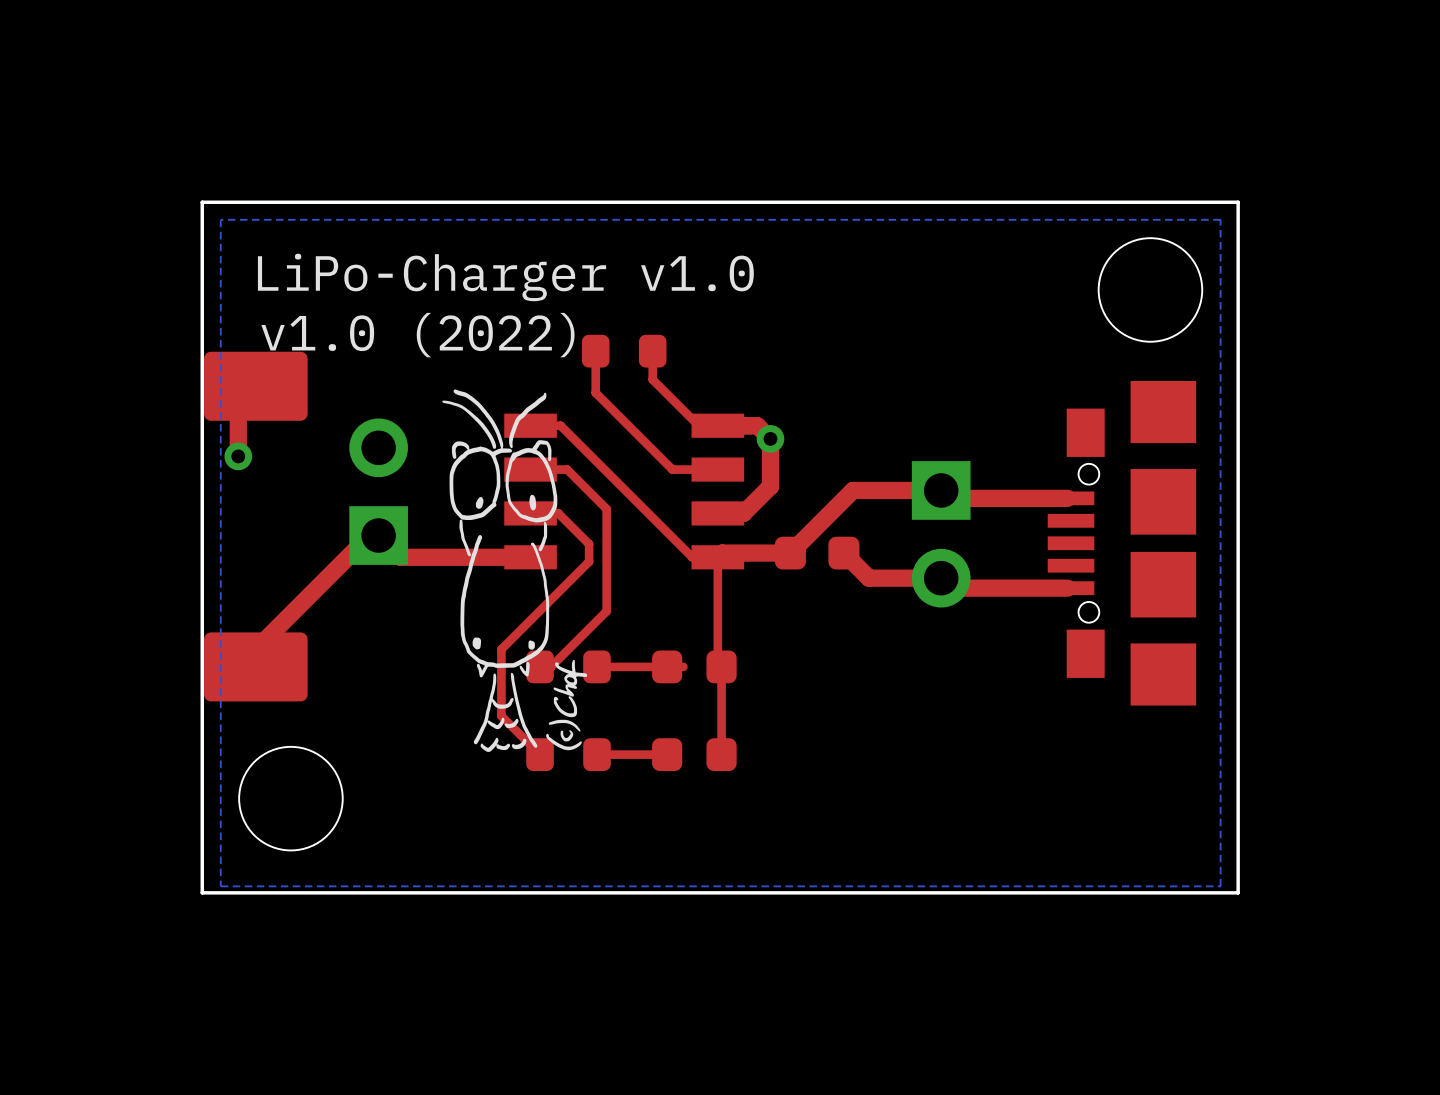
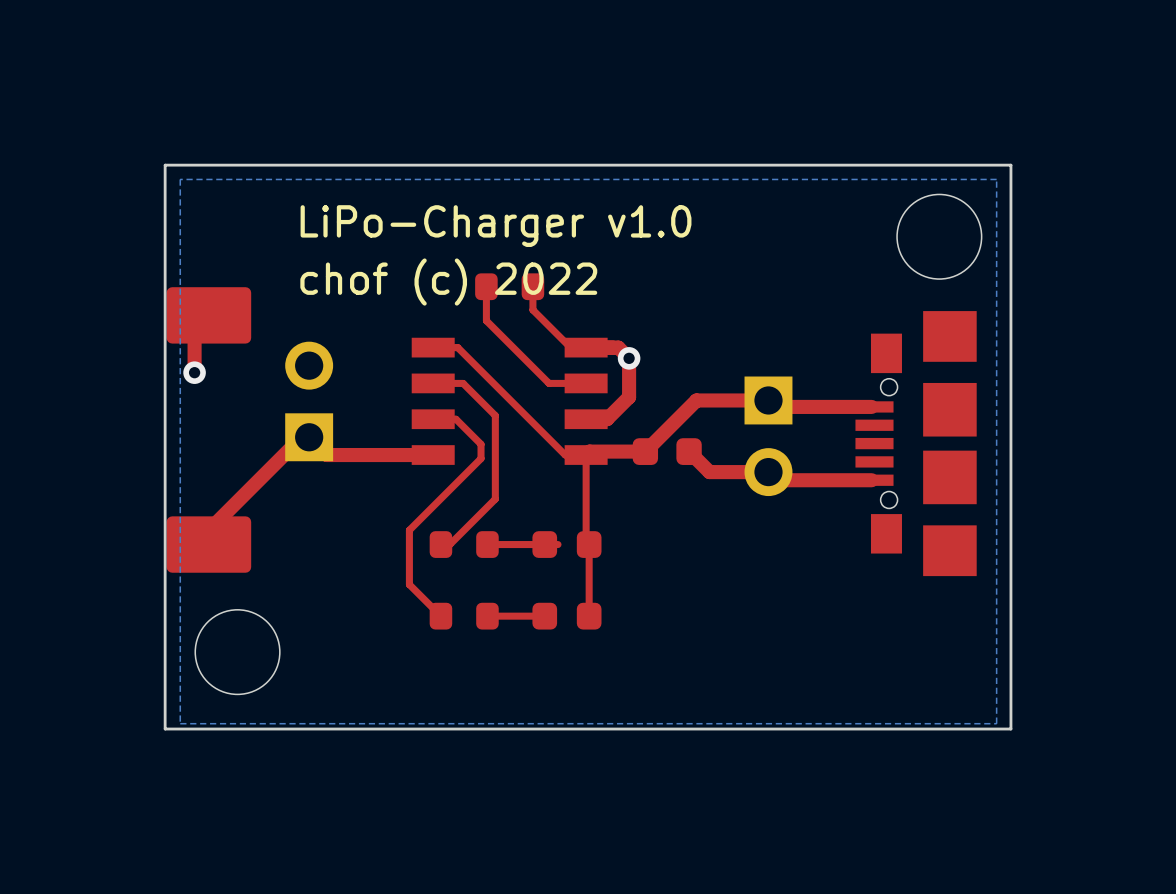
text position: LiPo-Charger v1.0 (505, 277) -> LiPo-Charger v1.0 (496, 226)
text: v1.0 (2022) (417, 335) -> none
text: none -> chof (c) 2022 (448, 282)
drawing: [442, 389, 588, 752] -> none

